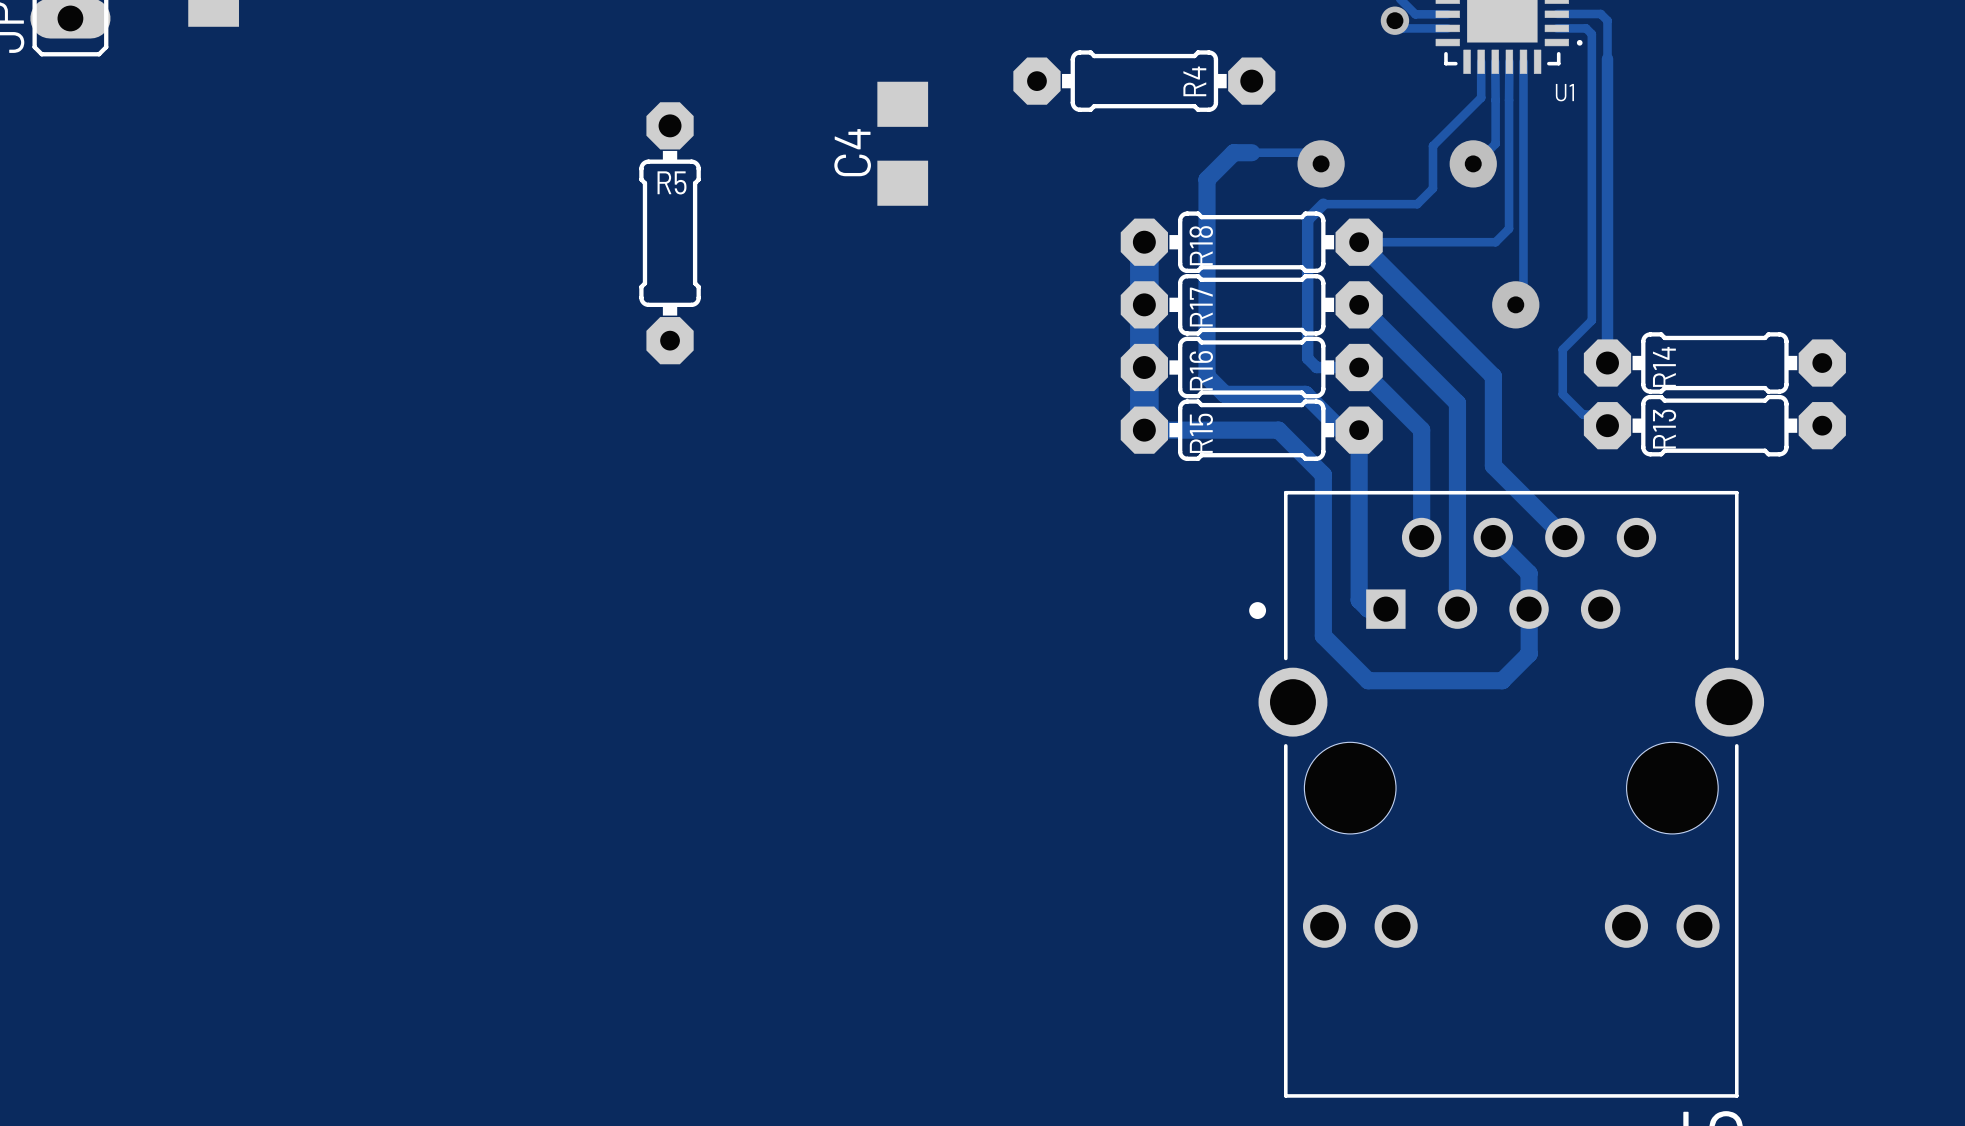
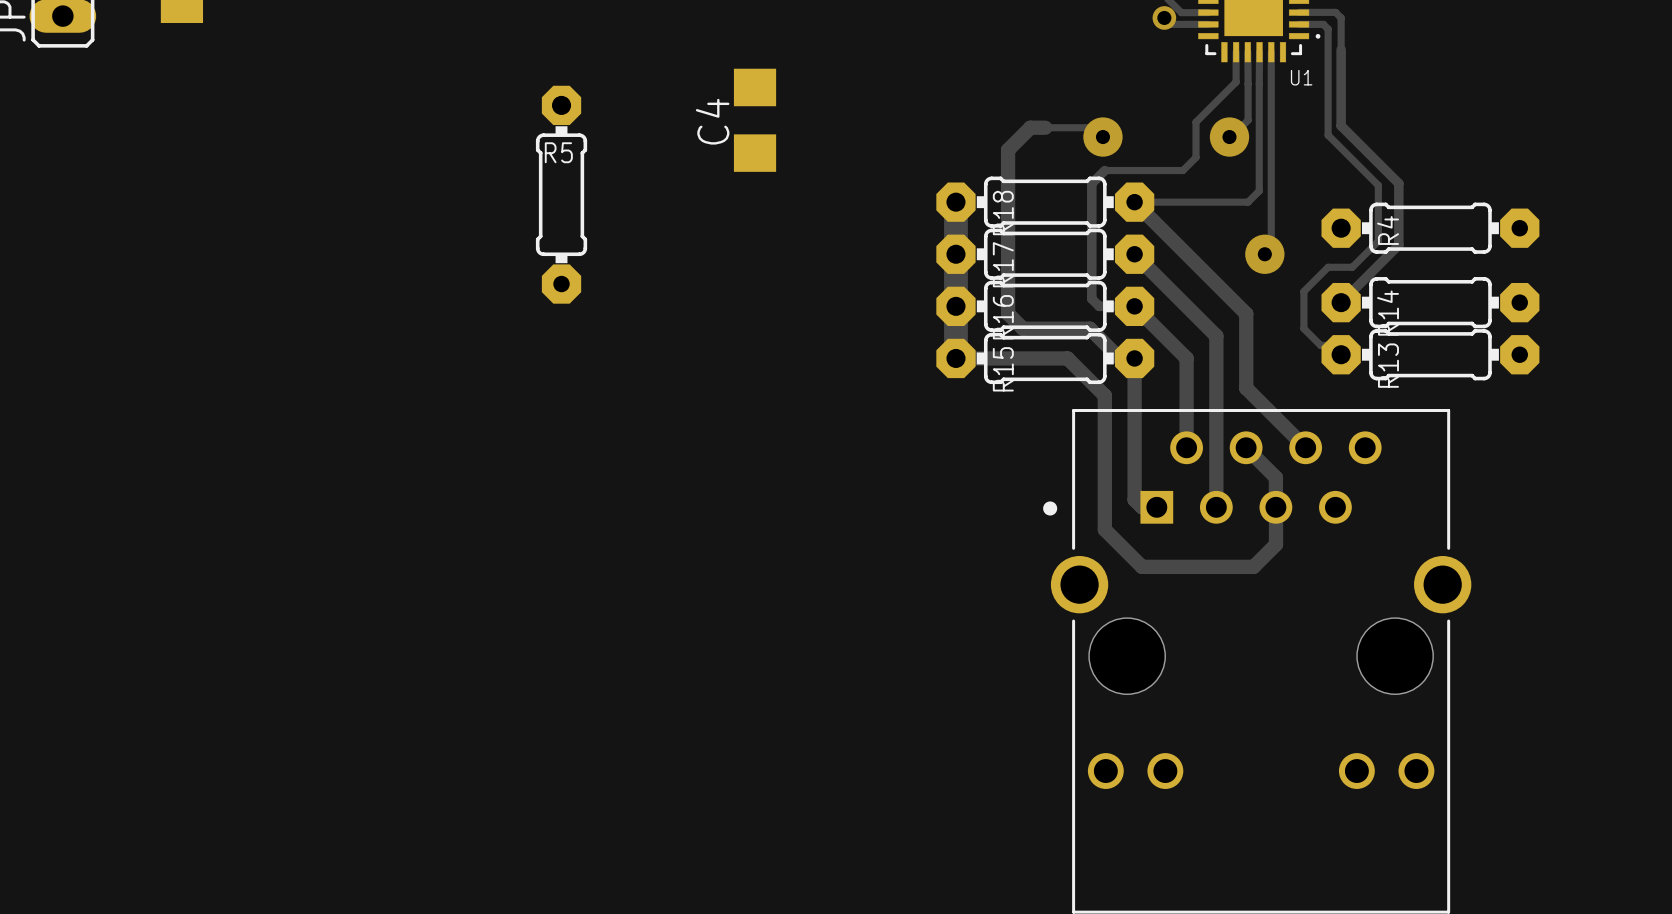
R4 rotation: 0° (1144, 81) -> 180° (1430, 228)
R4 position: (1144, 81) -> (1430, 228)
track: (1607, 150) (1607, 363) -> (1341, 125) (1398, 183) (1398, 244) (1341, 302)
track: (1591, 161) (1591, 320) -> (1328, 135) (1378, 185) (1378, 241) (1352, 267) (1328, 267)

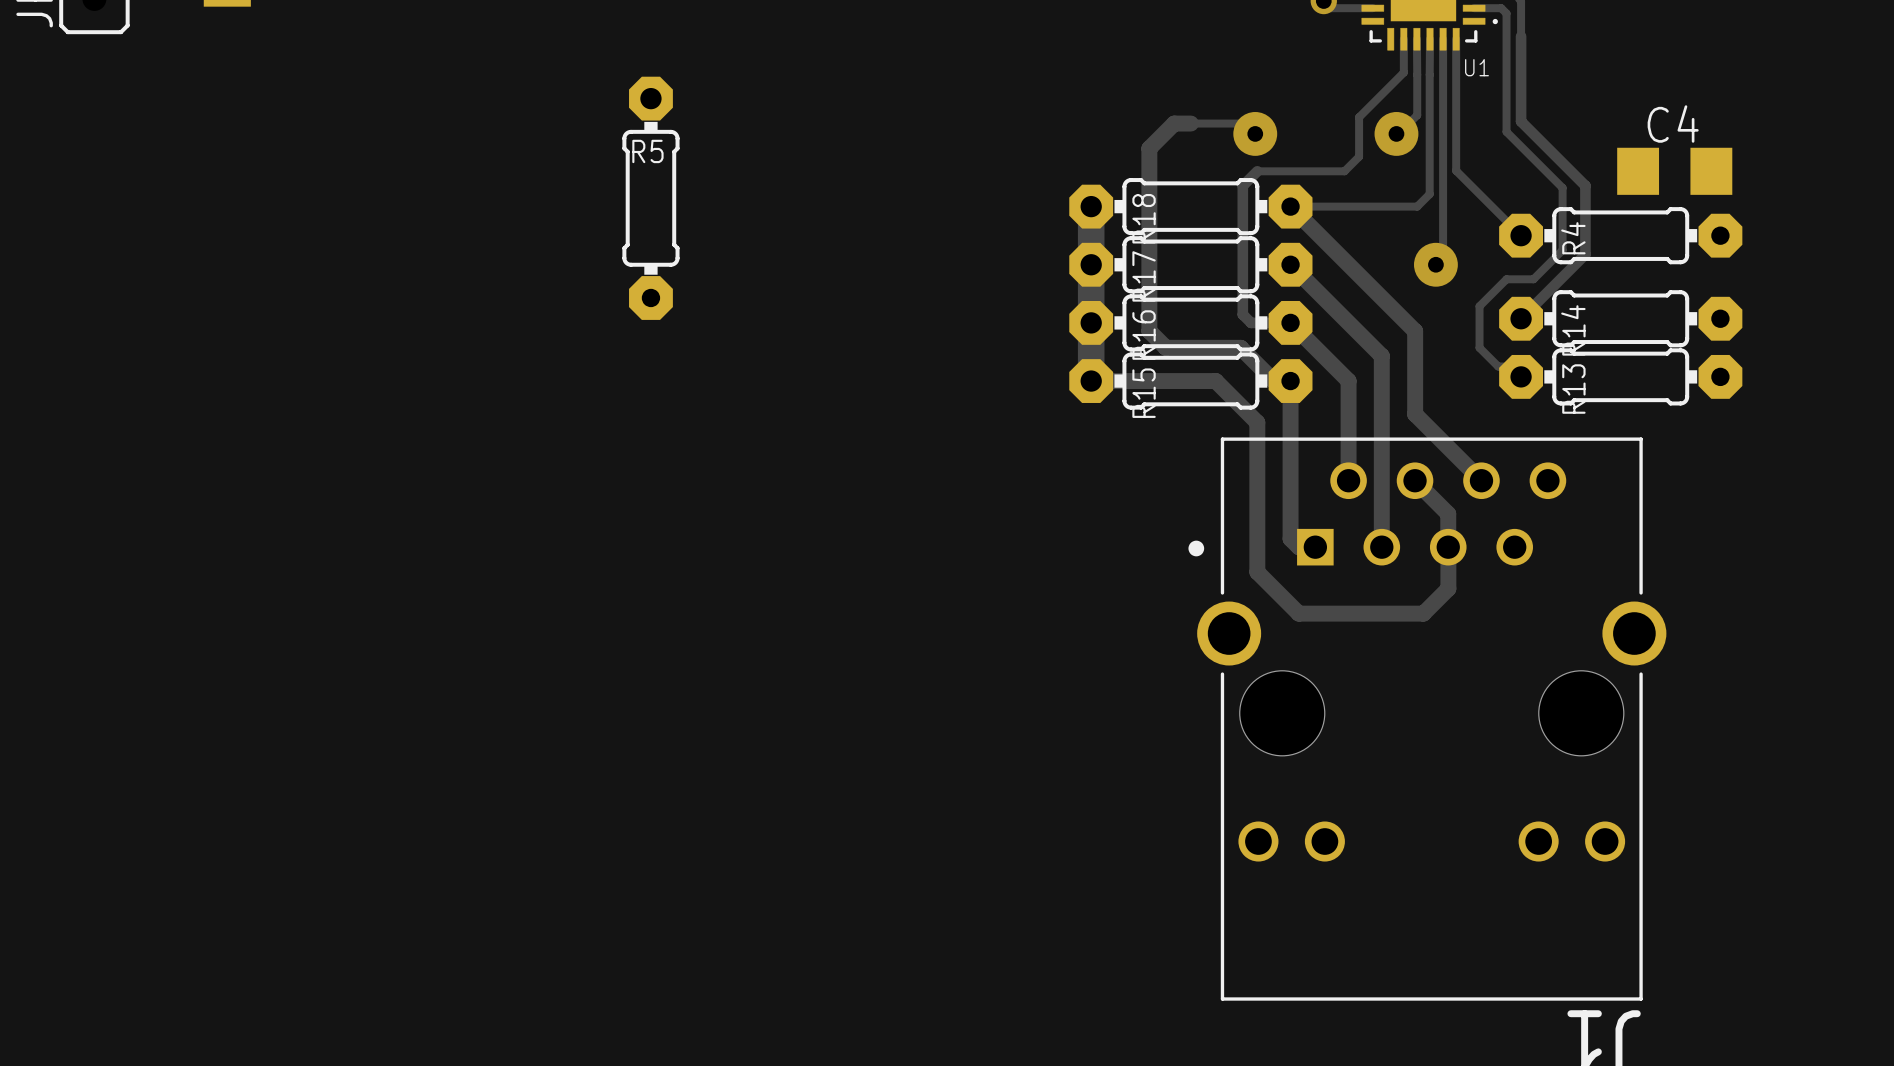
track: none -> (1456, 39) (1456, 170) (1521, 235)
C4 rotation: 0° (755, 120) -> 90° clockwise (1674, 171)
C4 position: (755, 120) -> (1674, 171)

